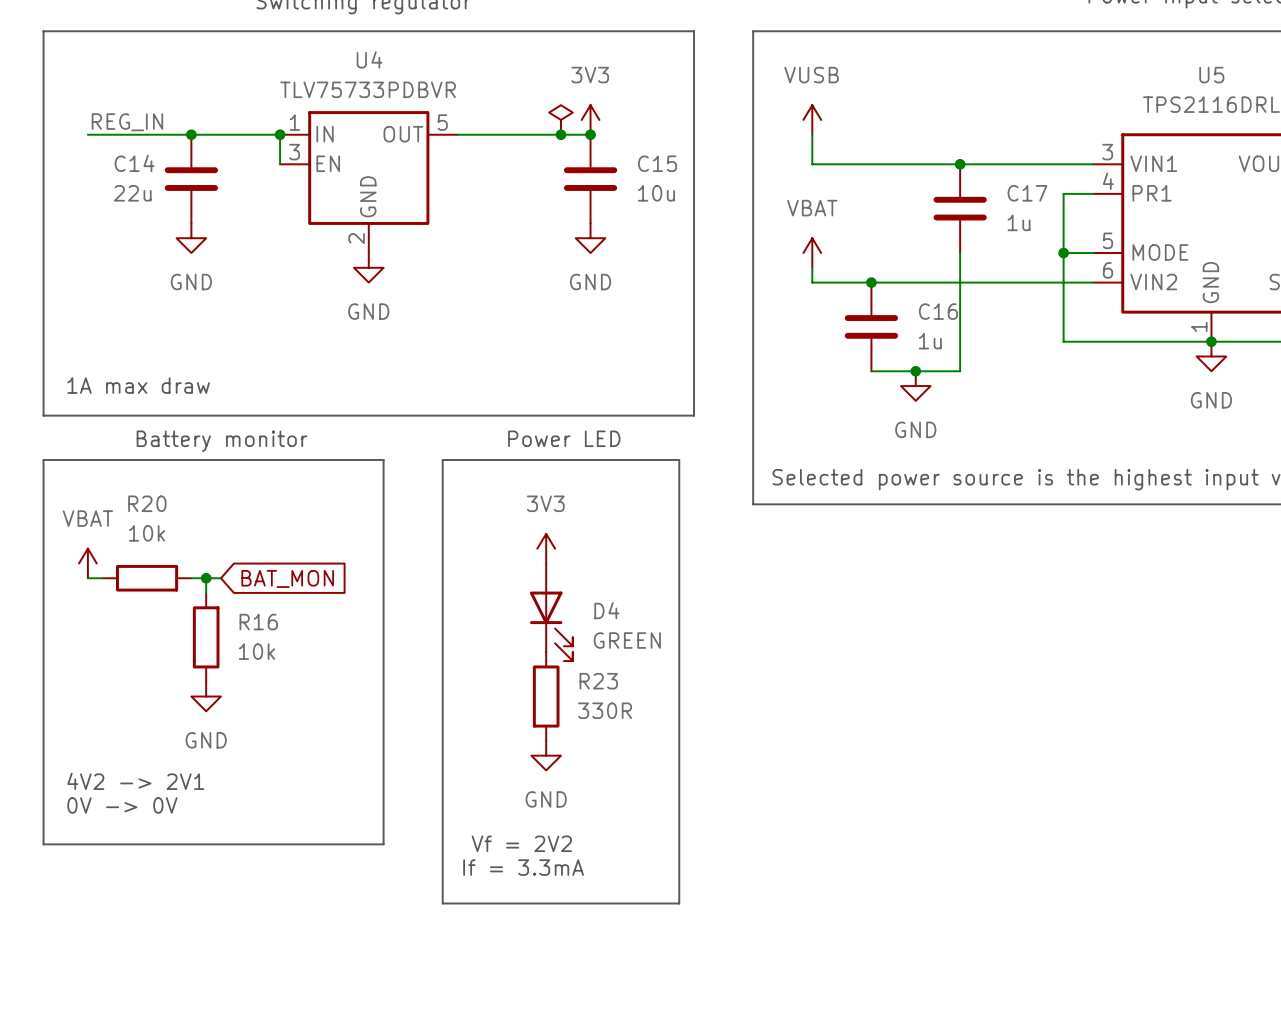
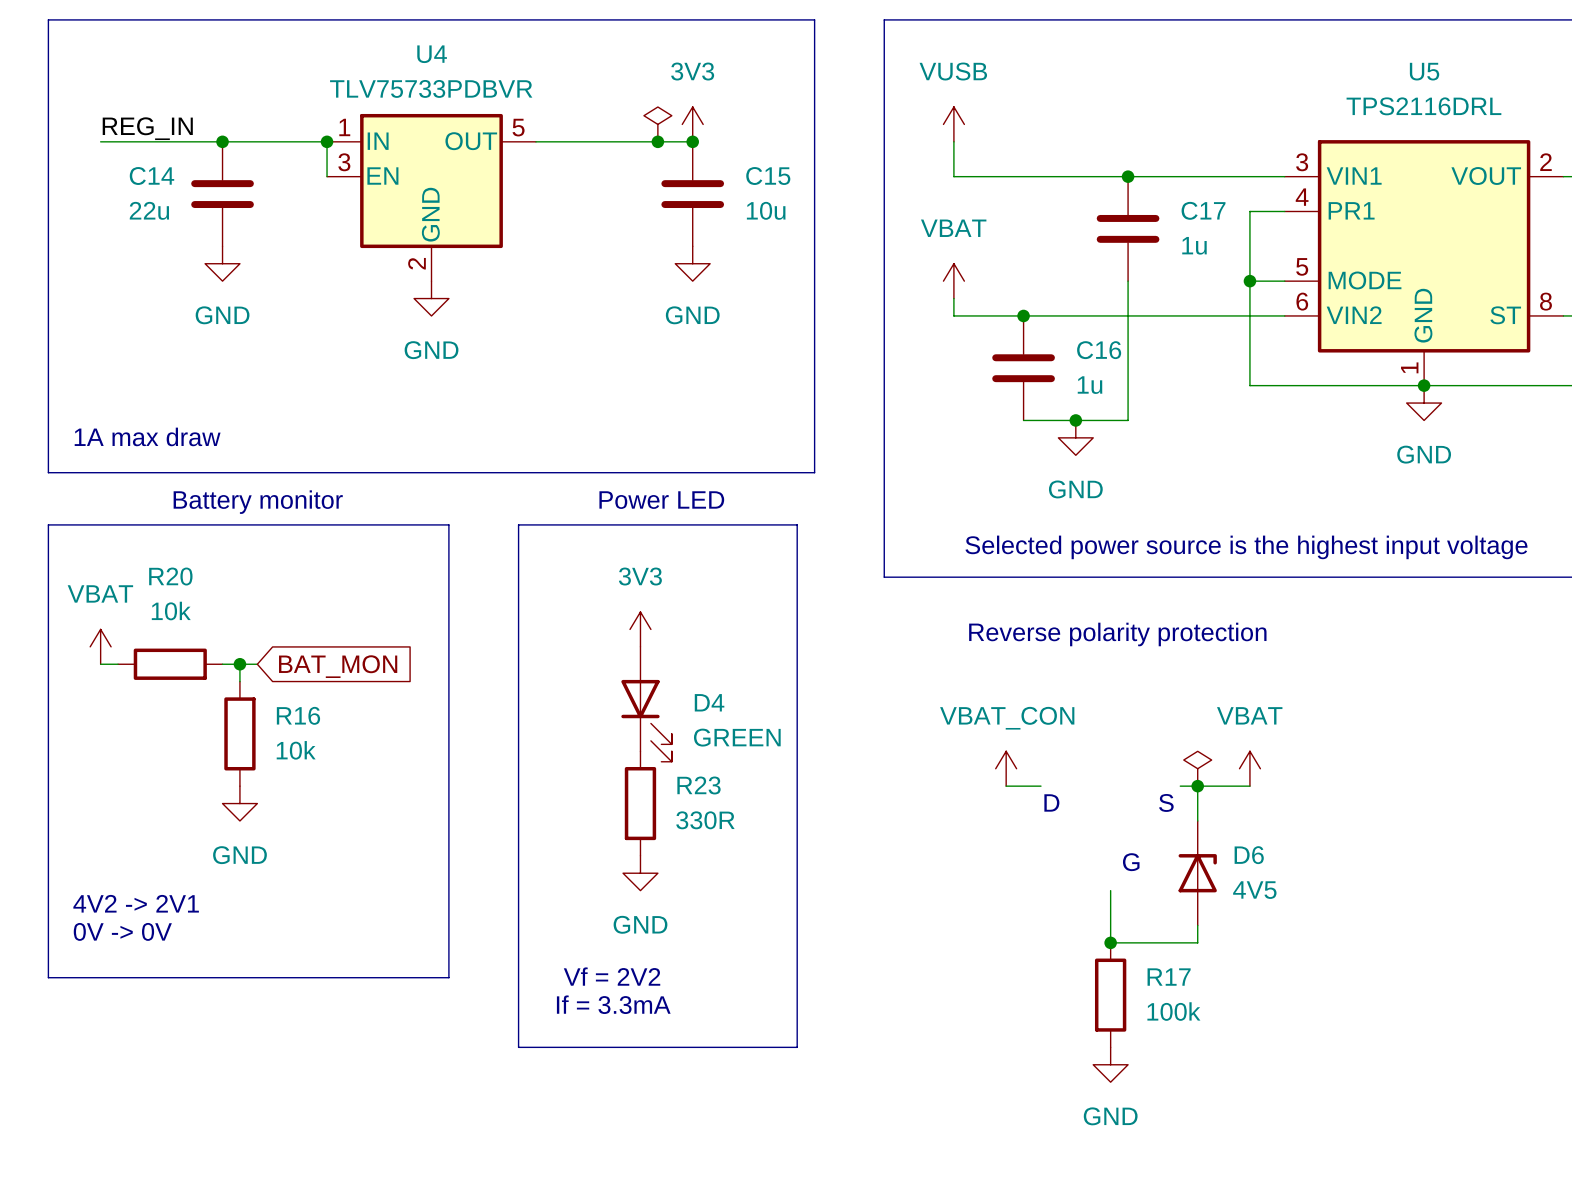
text: none -> Reverse polarity protection (1117, 634)
power symbol: none -> VBAT_CON (1006, 768)
power symbol: none -> (1197, 768)
power symbol: none -> VBAT (1249, 768)
wire: none -> (1006, 786) (1040, 786)
wire: none -> (1180, 786) (1249, 786)
wire: none -> (1197, 786) (1197, 820)
junction: none -> (1197, 786)
text: none -> D (1051, 802)
text: none -> S (1166, 802)
text: none -> G (1131, 862)
D6: none -> 4V5 (1197, 873)
wire: none -> (1110, 890) (1110, 942) (1197, 942) (1197, 925)
junction: none -> (1110, 942)
R17: none -> 100k (1110, 995)
power symbol: none -> GND (1110, 1064)

